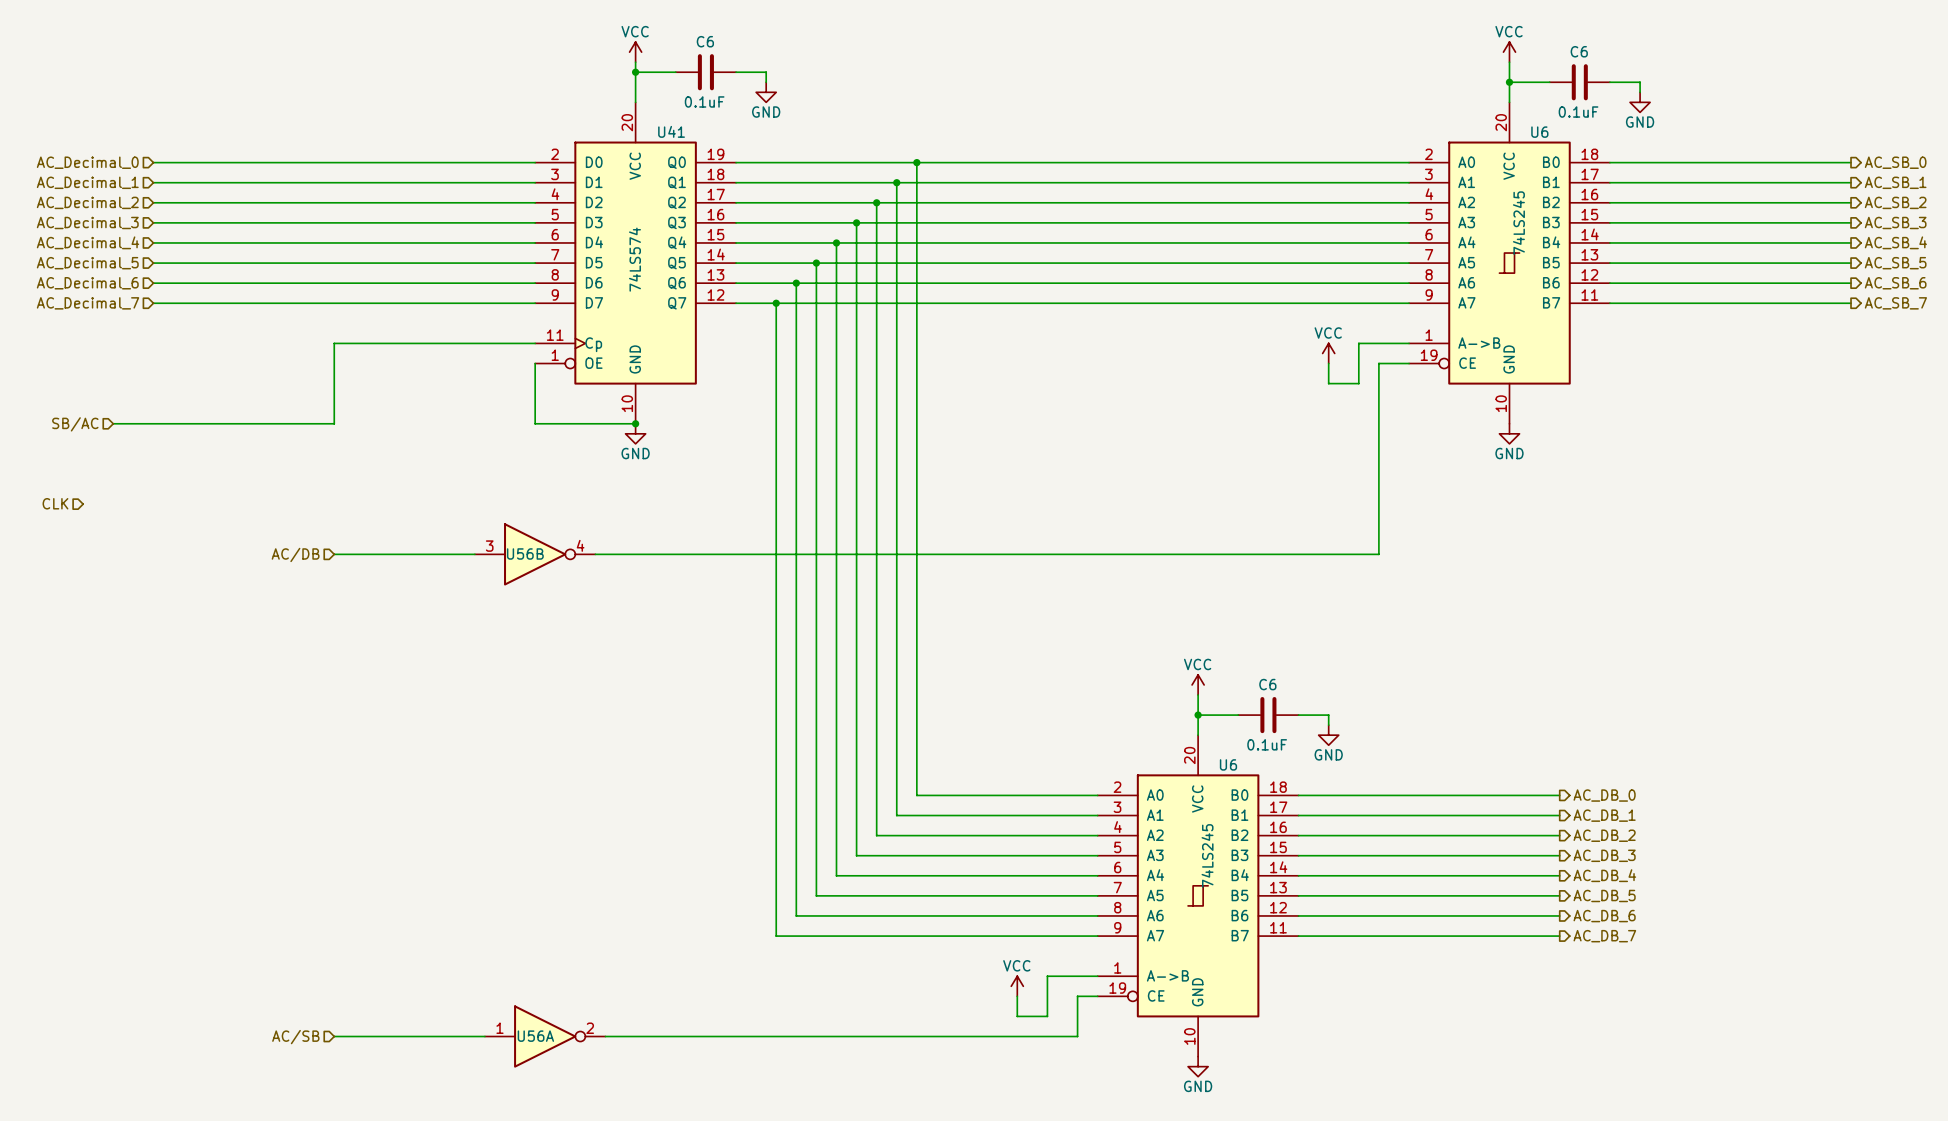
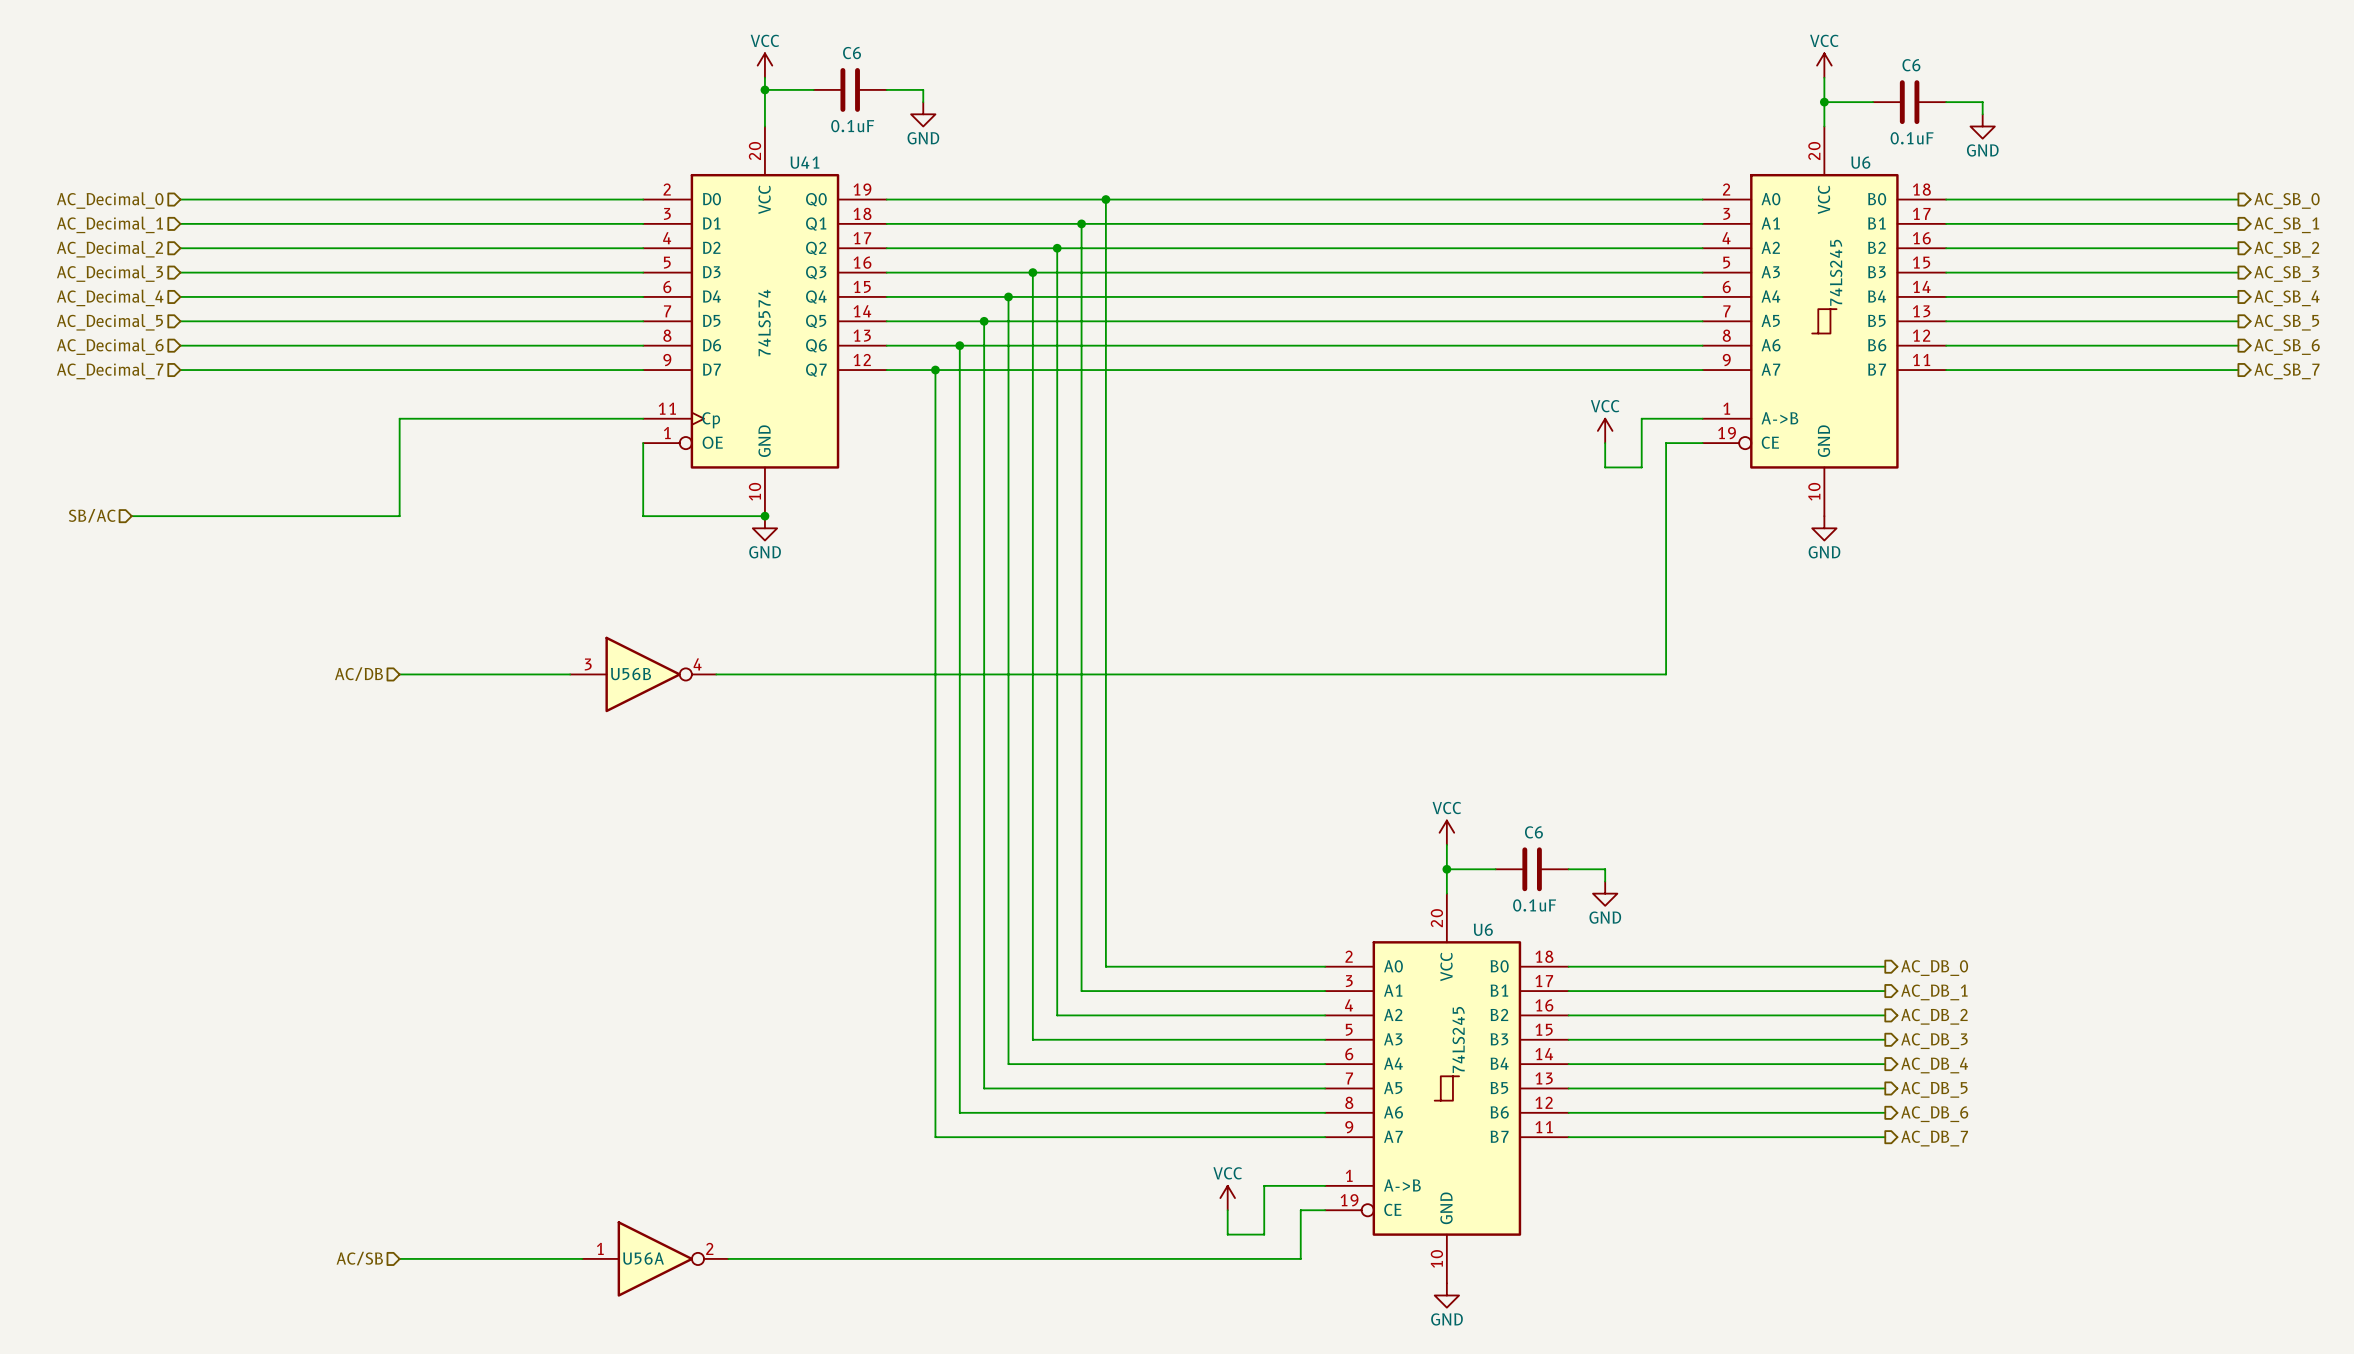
hierarchical label: CLK (55, 503) -> none

